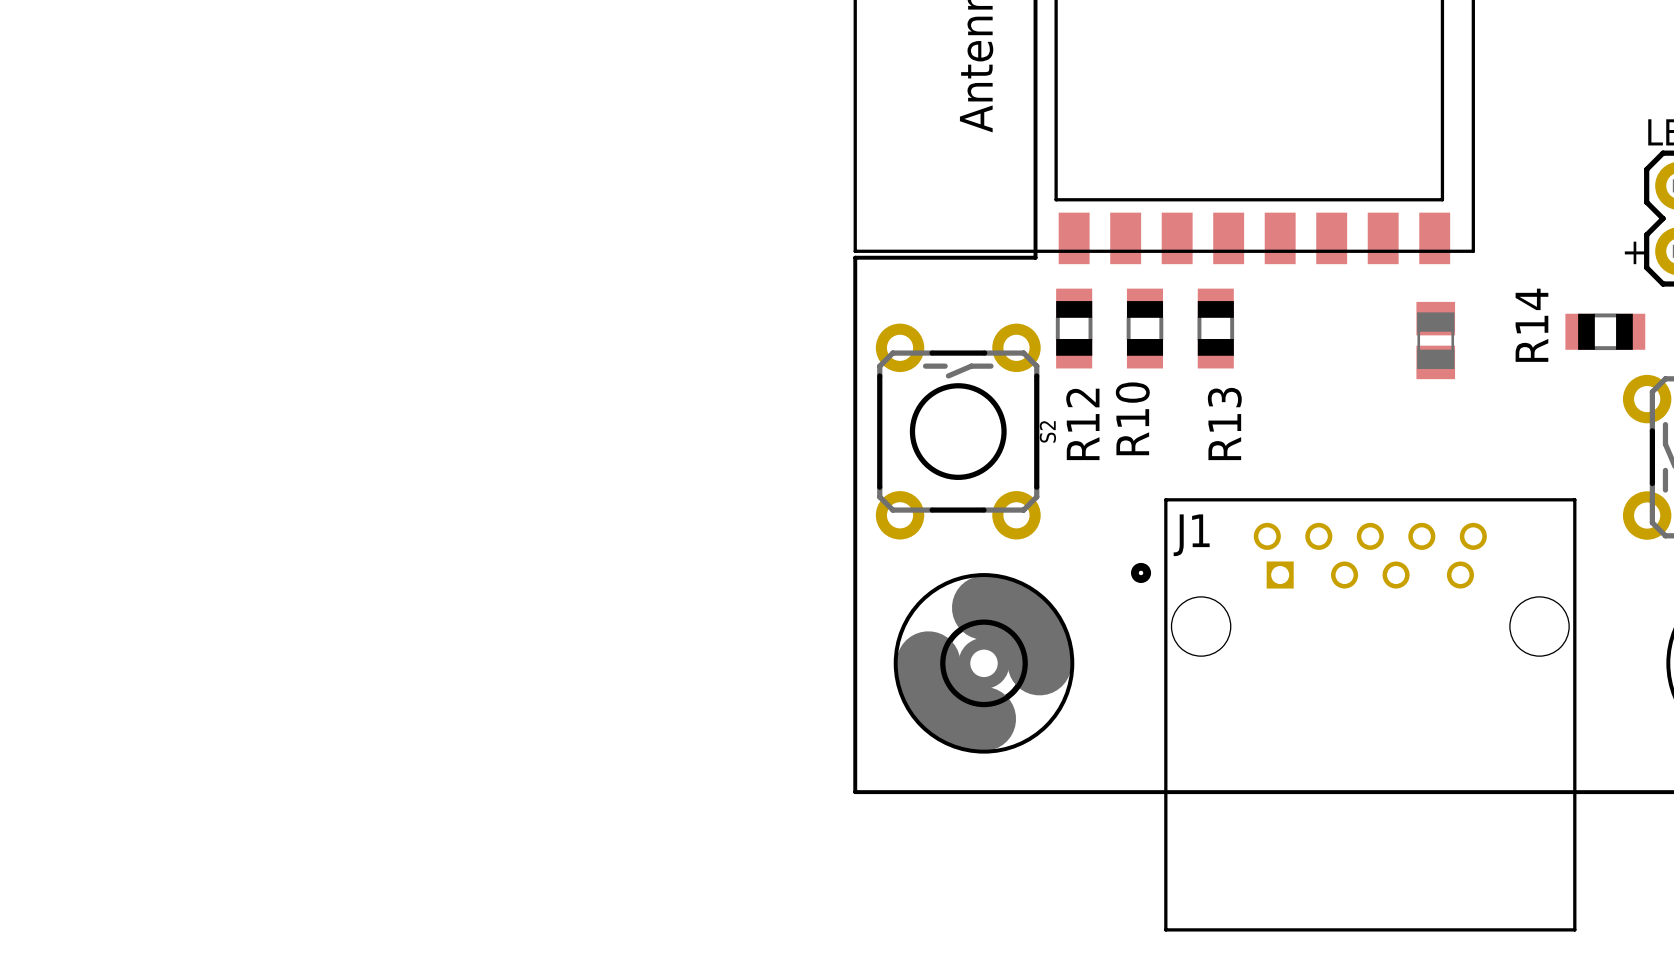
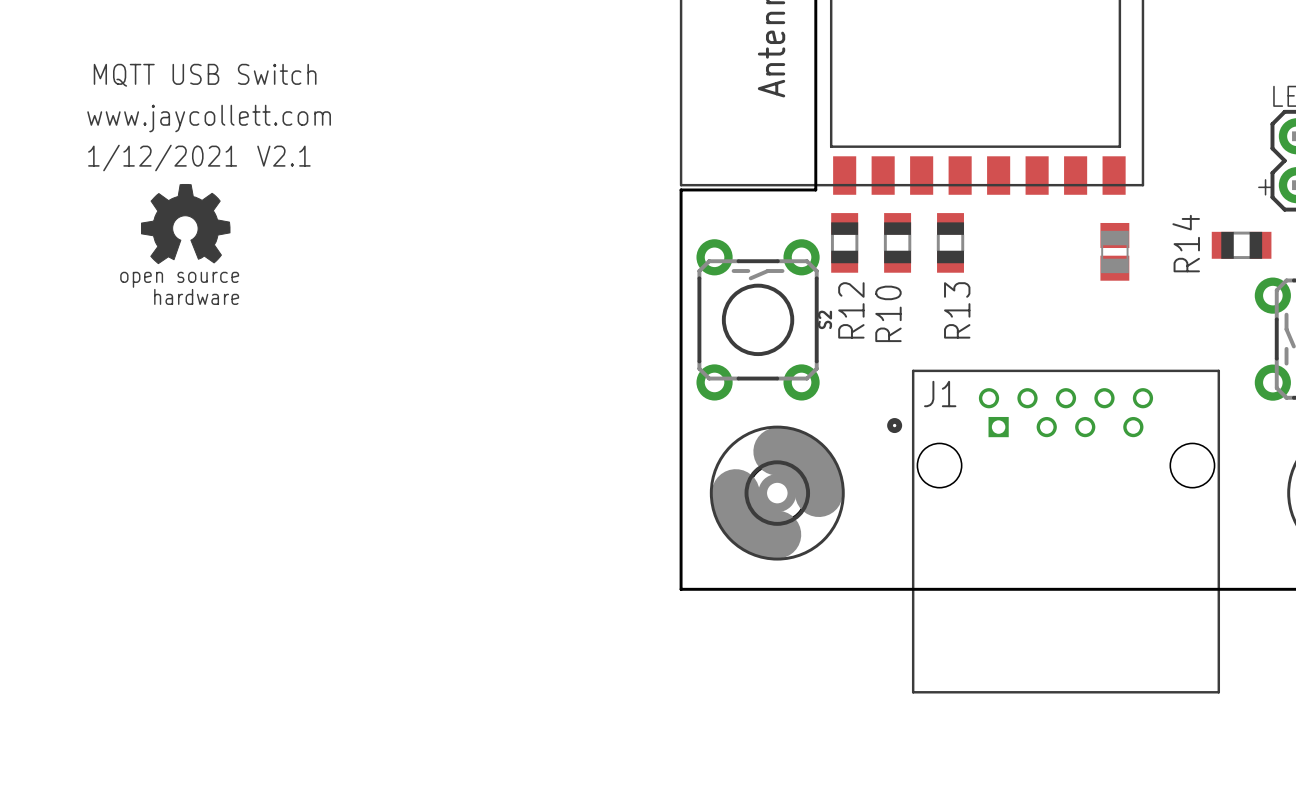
text: none -> MQTT USB Switch (205, 75)
text: none -> www.jaycollett.com (209, 118)
text: none -> V2.1 (283, 156)
text: none -> 1/12/2021 (162, 158)
drawing: none -> [141, 183, 231, 265]

